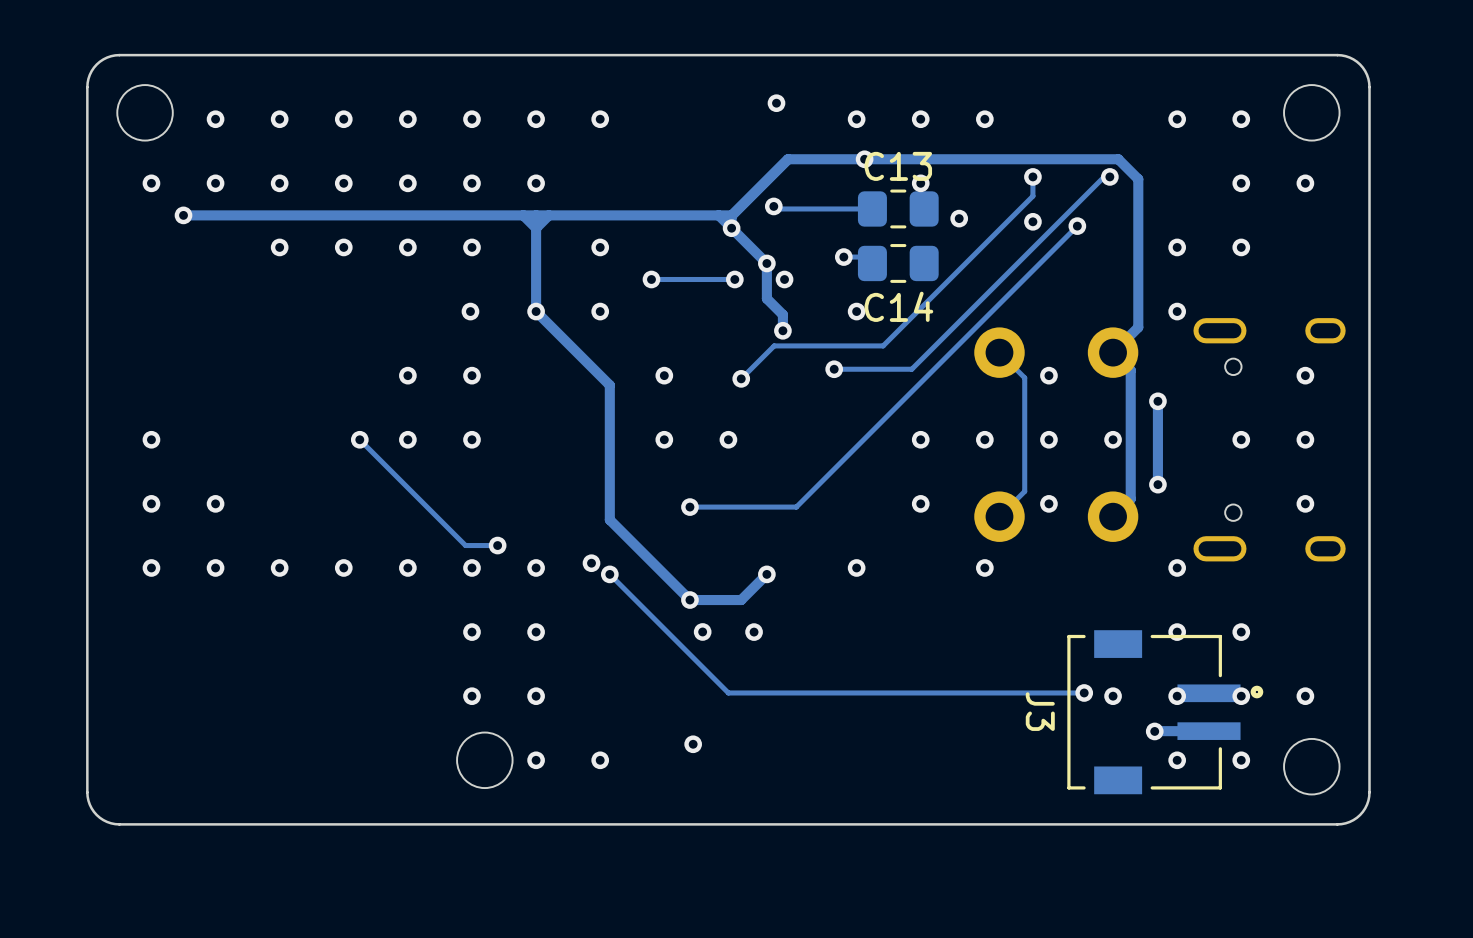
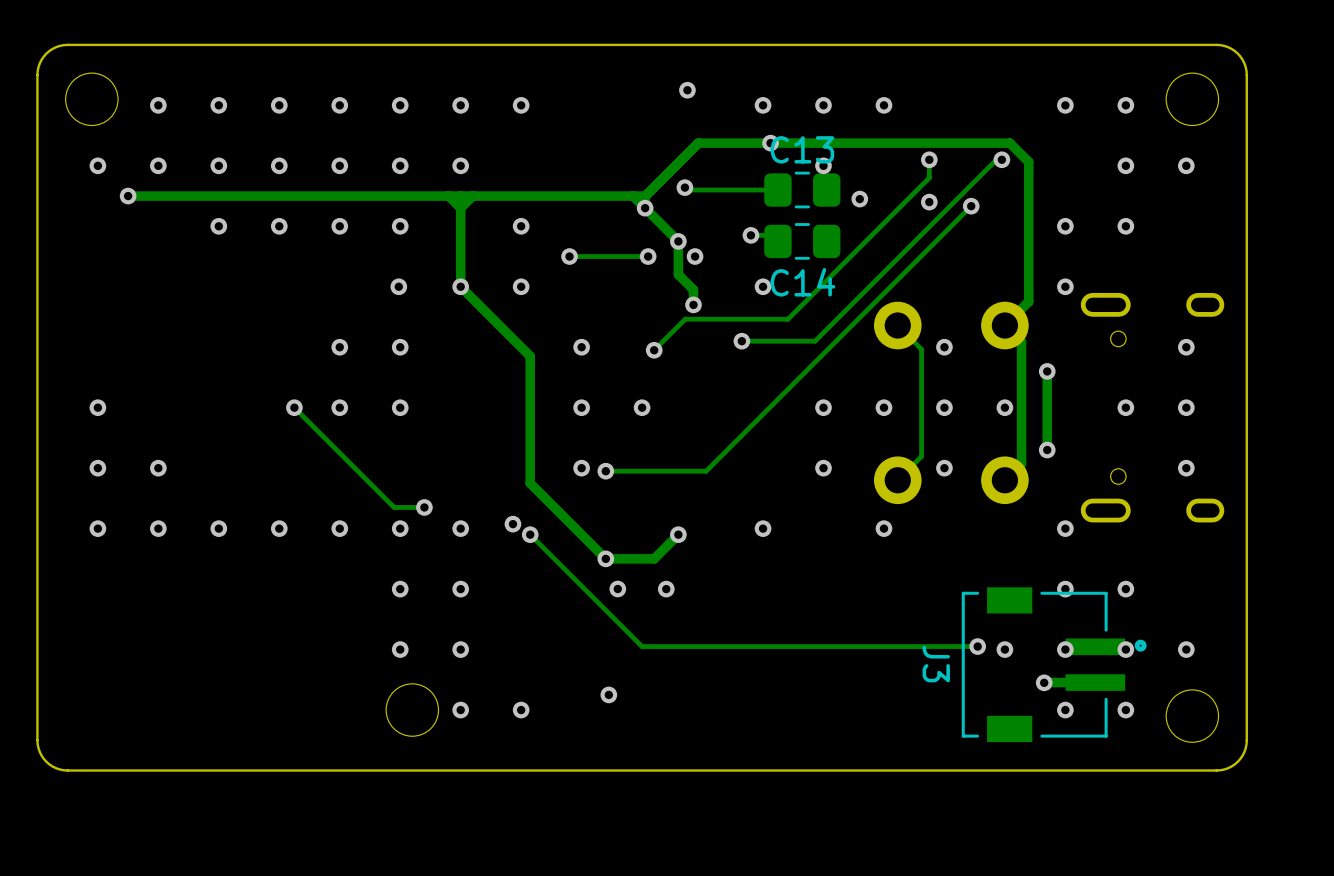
via: none -> (581, 468)

